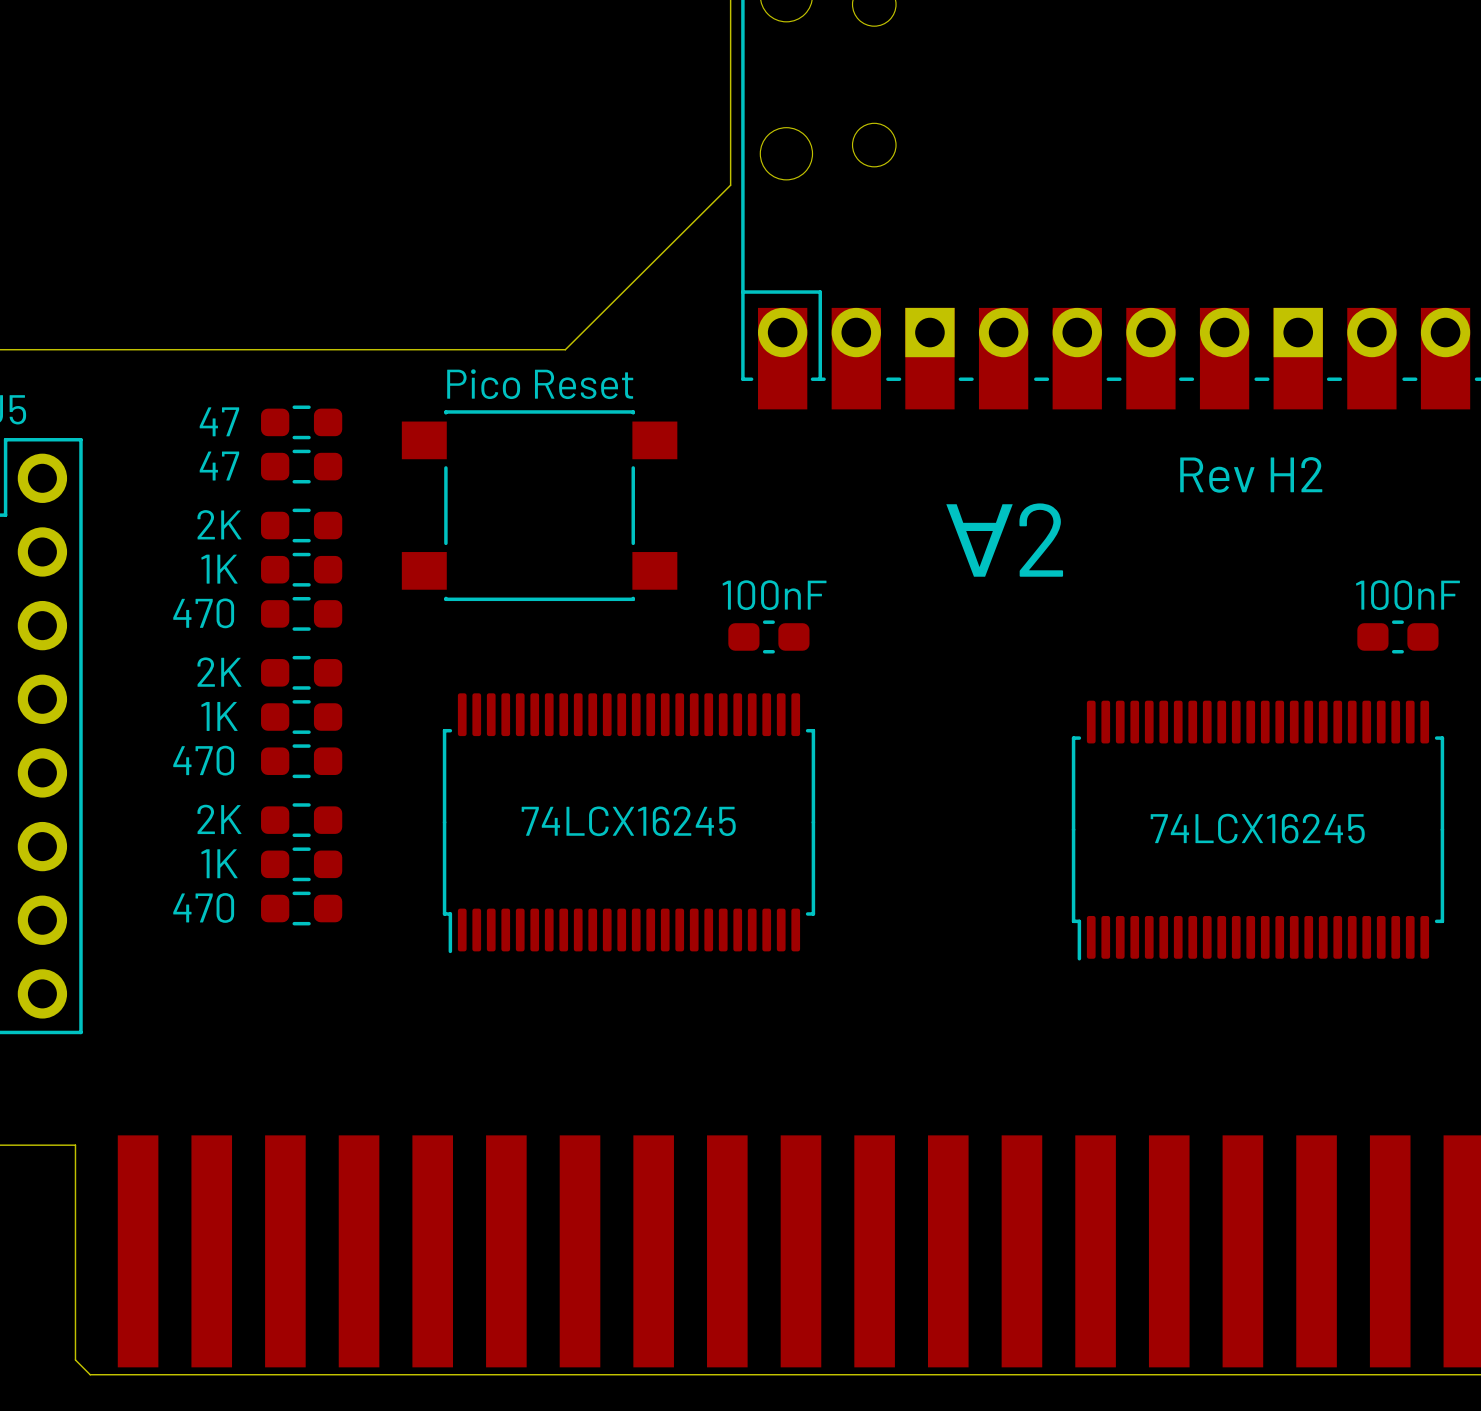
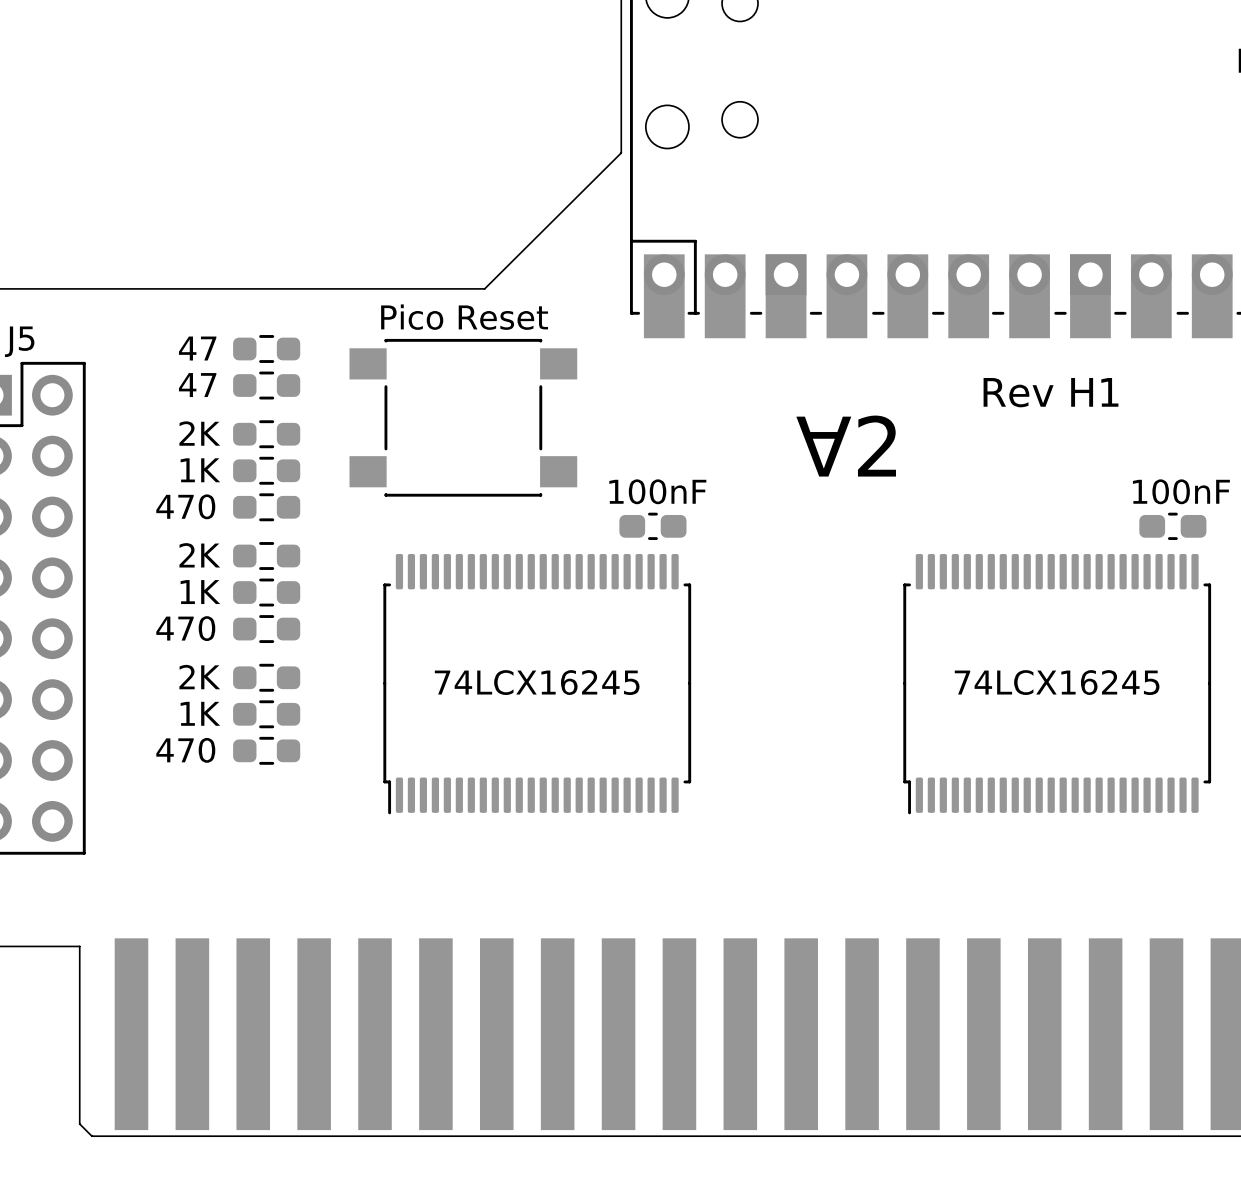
text: Rev H2 (1251, 474) -> Rev H1 (1051, 392)
part footprint: [442, 693, 816, 954] -> [383, 553, 692, 815]
part footprint: [1071, 700, 1445, 961] -> [903, 553, 1212, 815]

